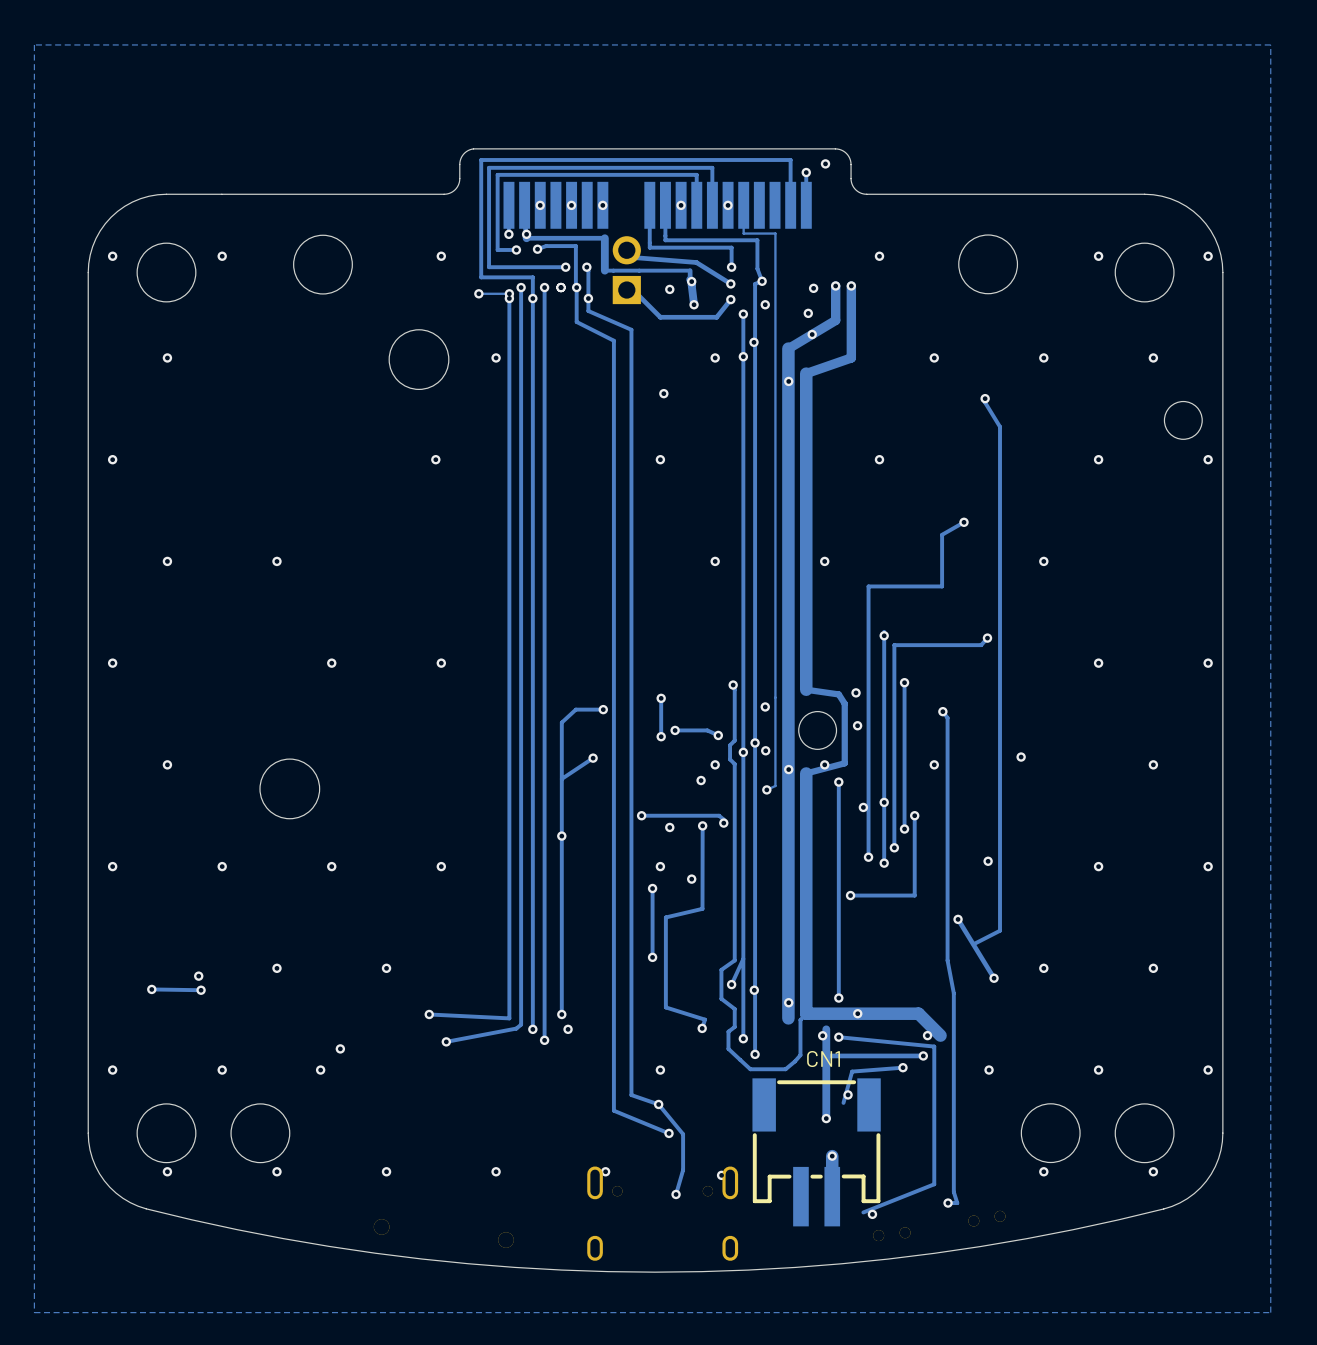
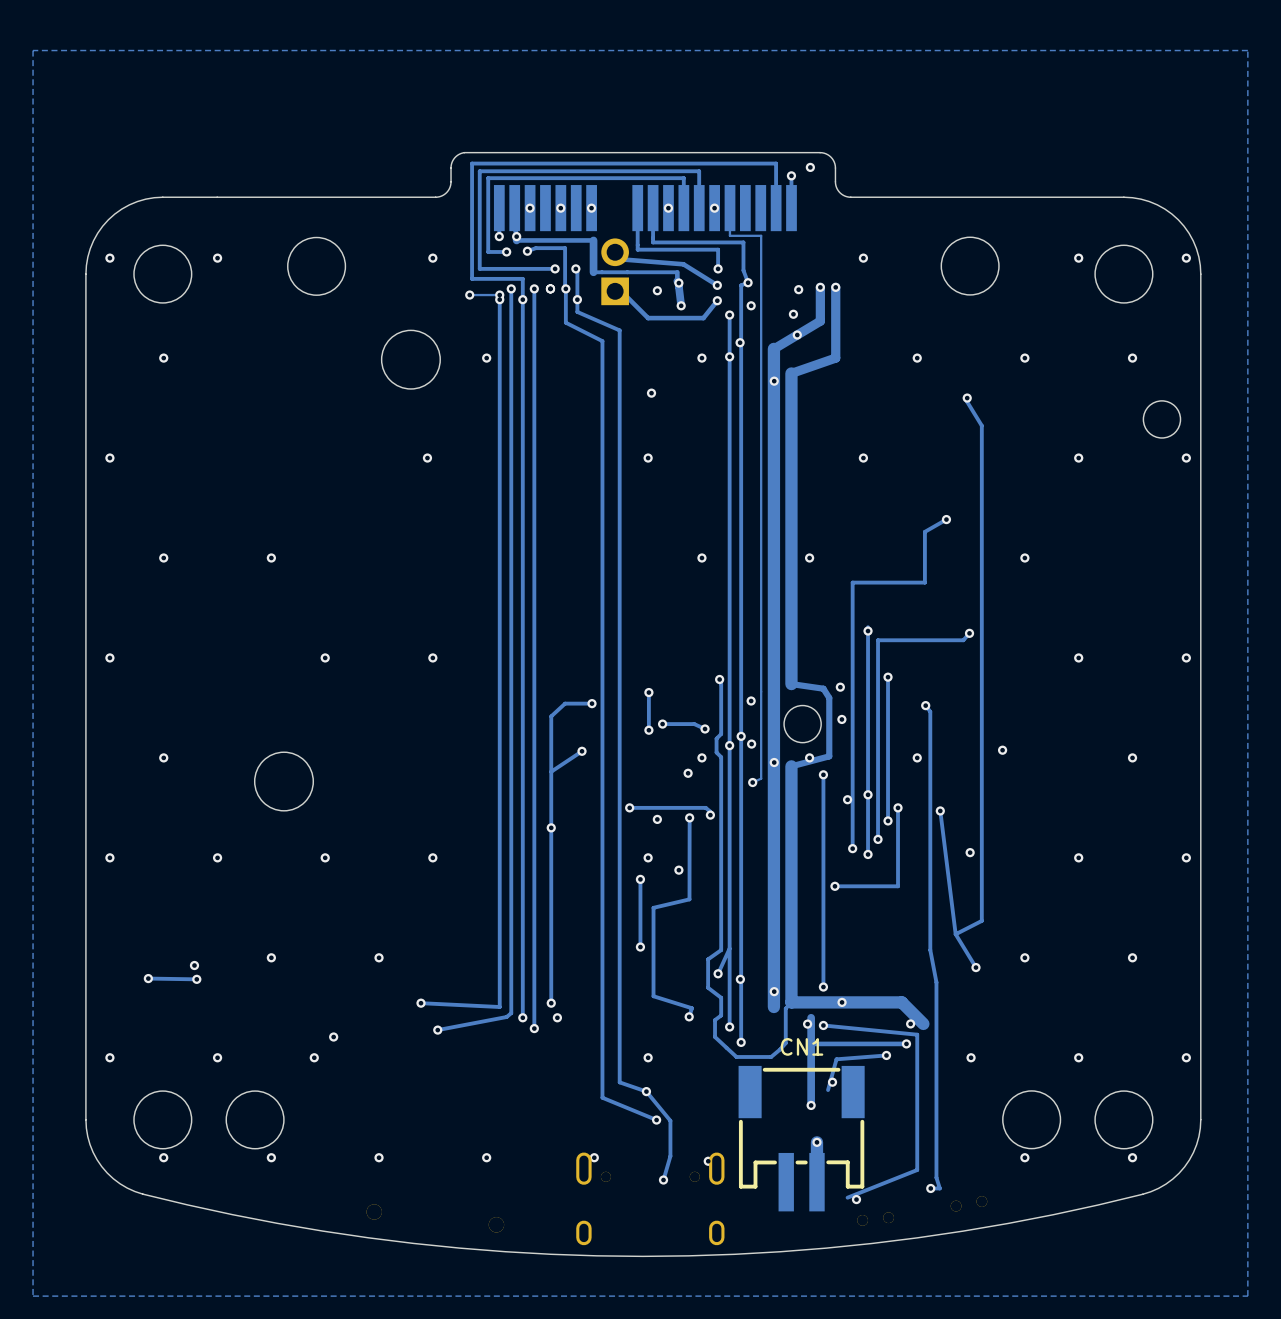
via: none -> (940, 810)
track: (958, 919) (994, 978) -> (940, 810) (955, 934) (975, 967)
via: (958, 919) -> none

